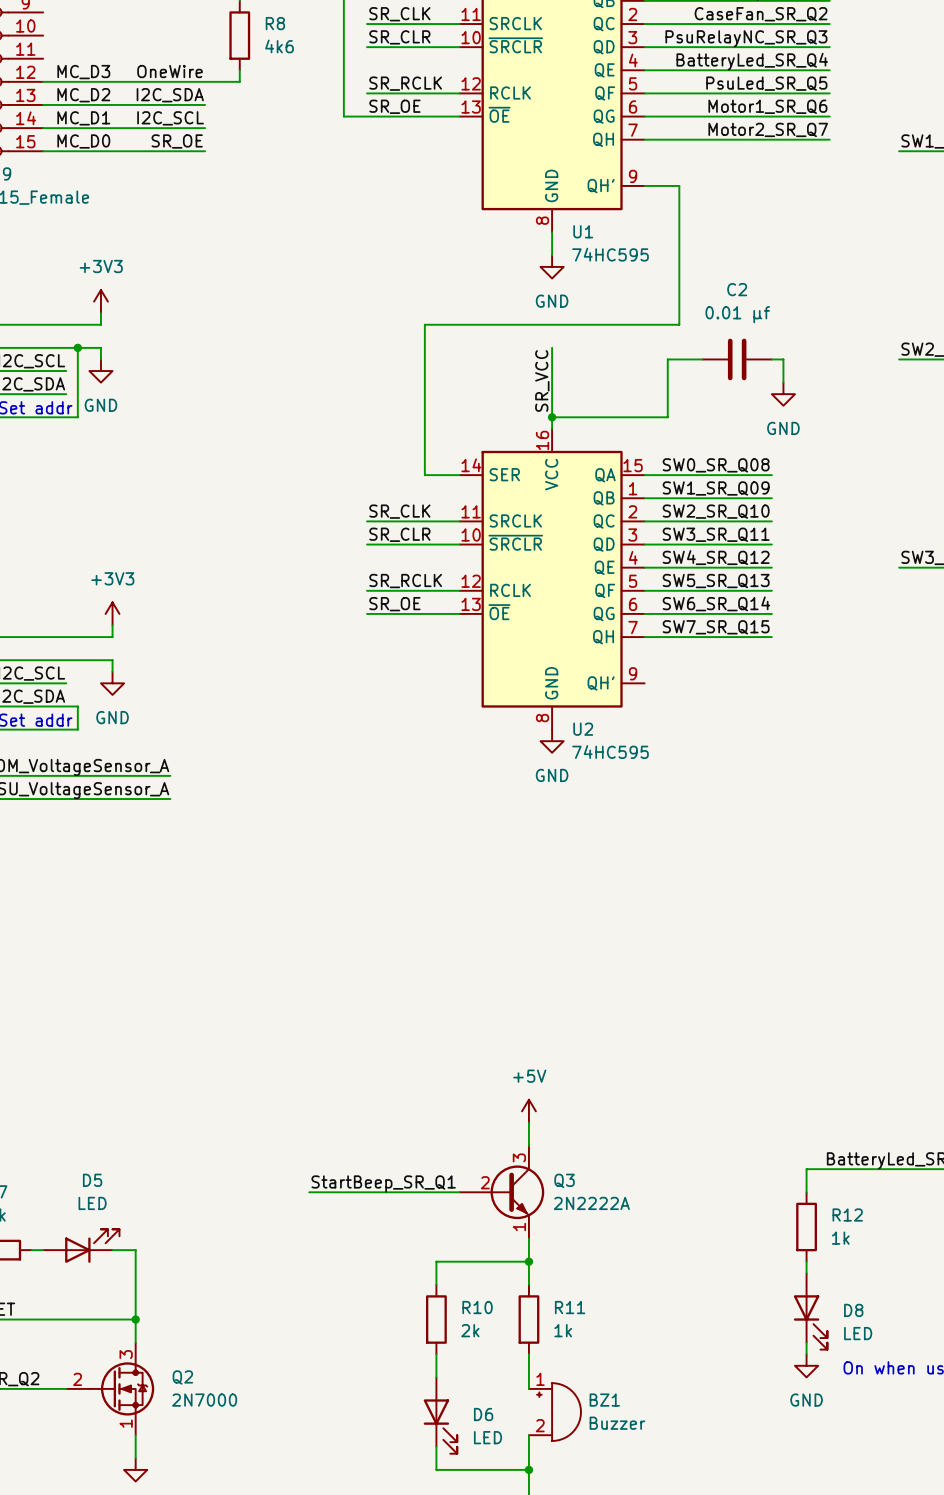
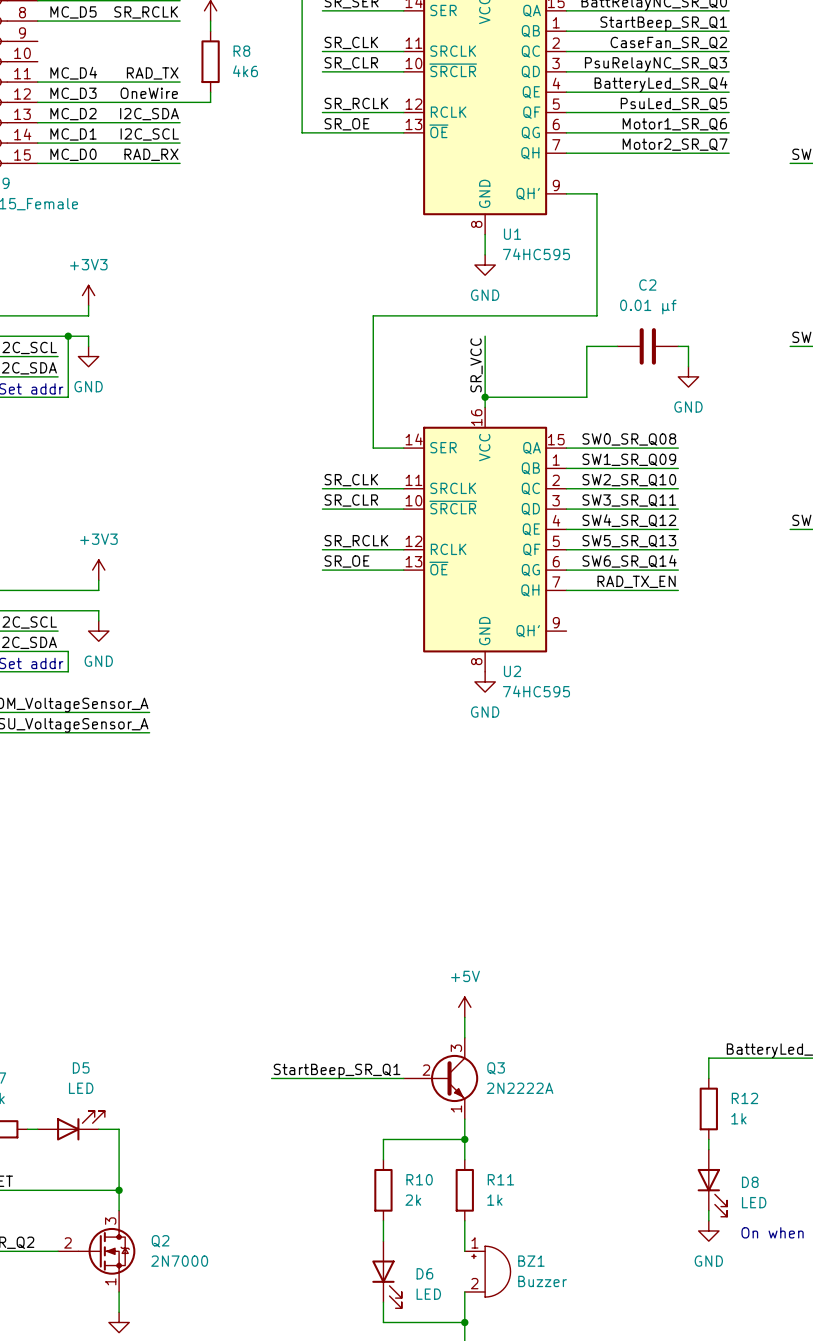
label: none -> MC_D4 (73, 73)
label: none -> RAD_TX (152, 73)
wire: none -> (37, 82) (180, 82)
label: SR_OE (177, 141) -> RAD_RX (151, 154)
label: SW7_SR_Q15 (716, 627) -> RAD_TX_EN (636, 581)

